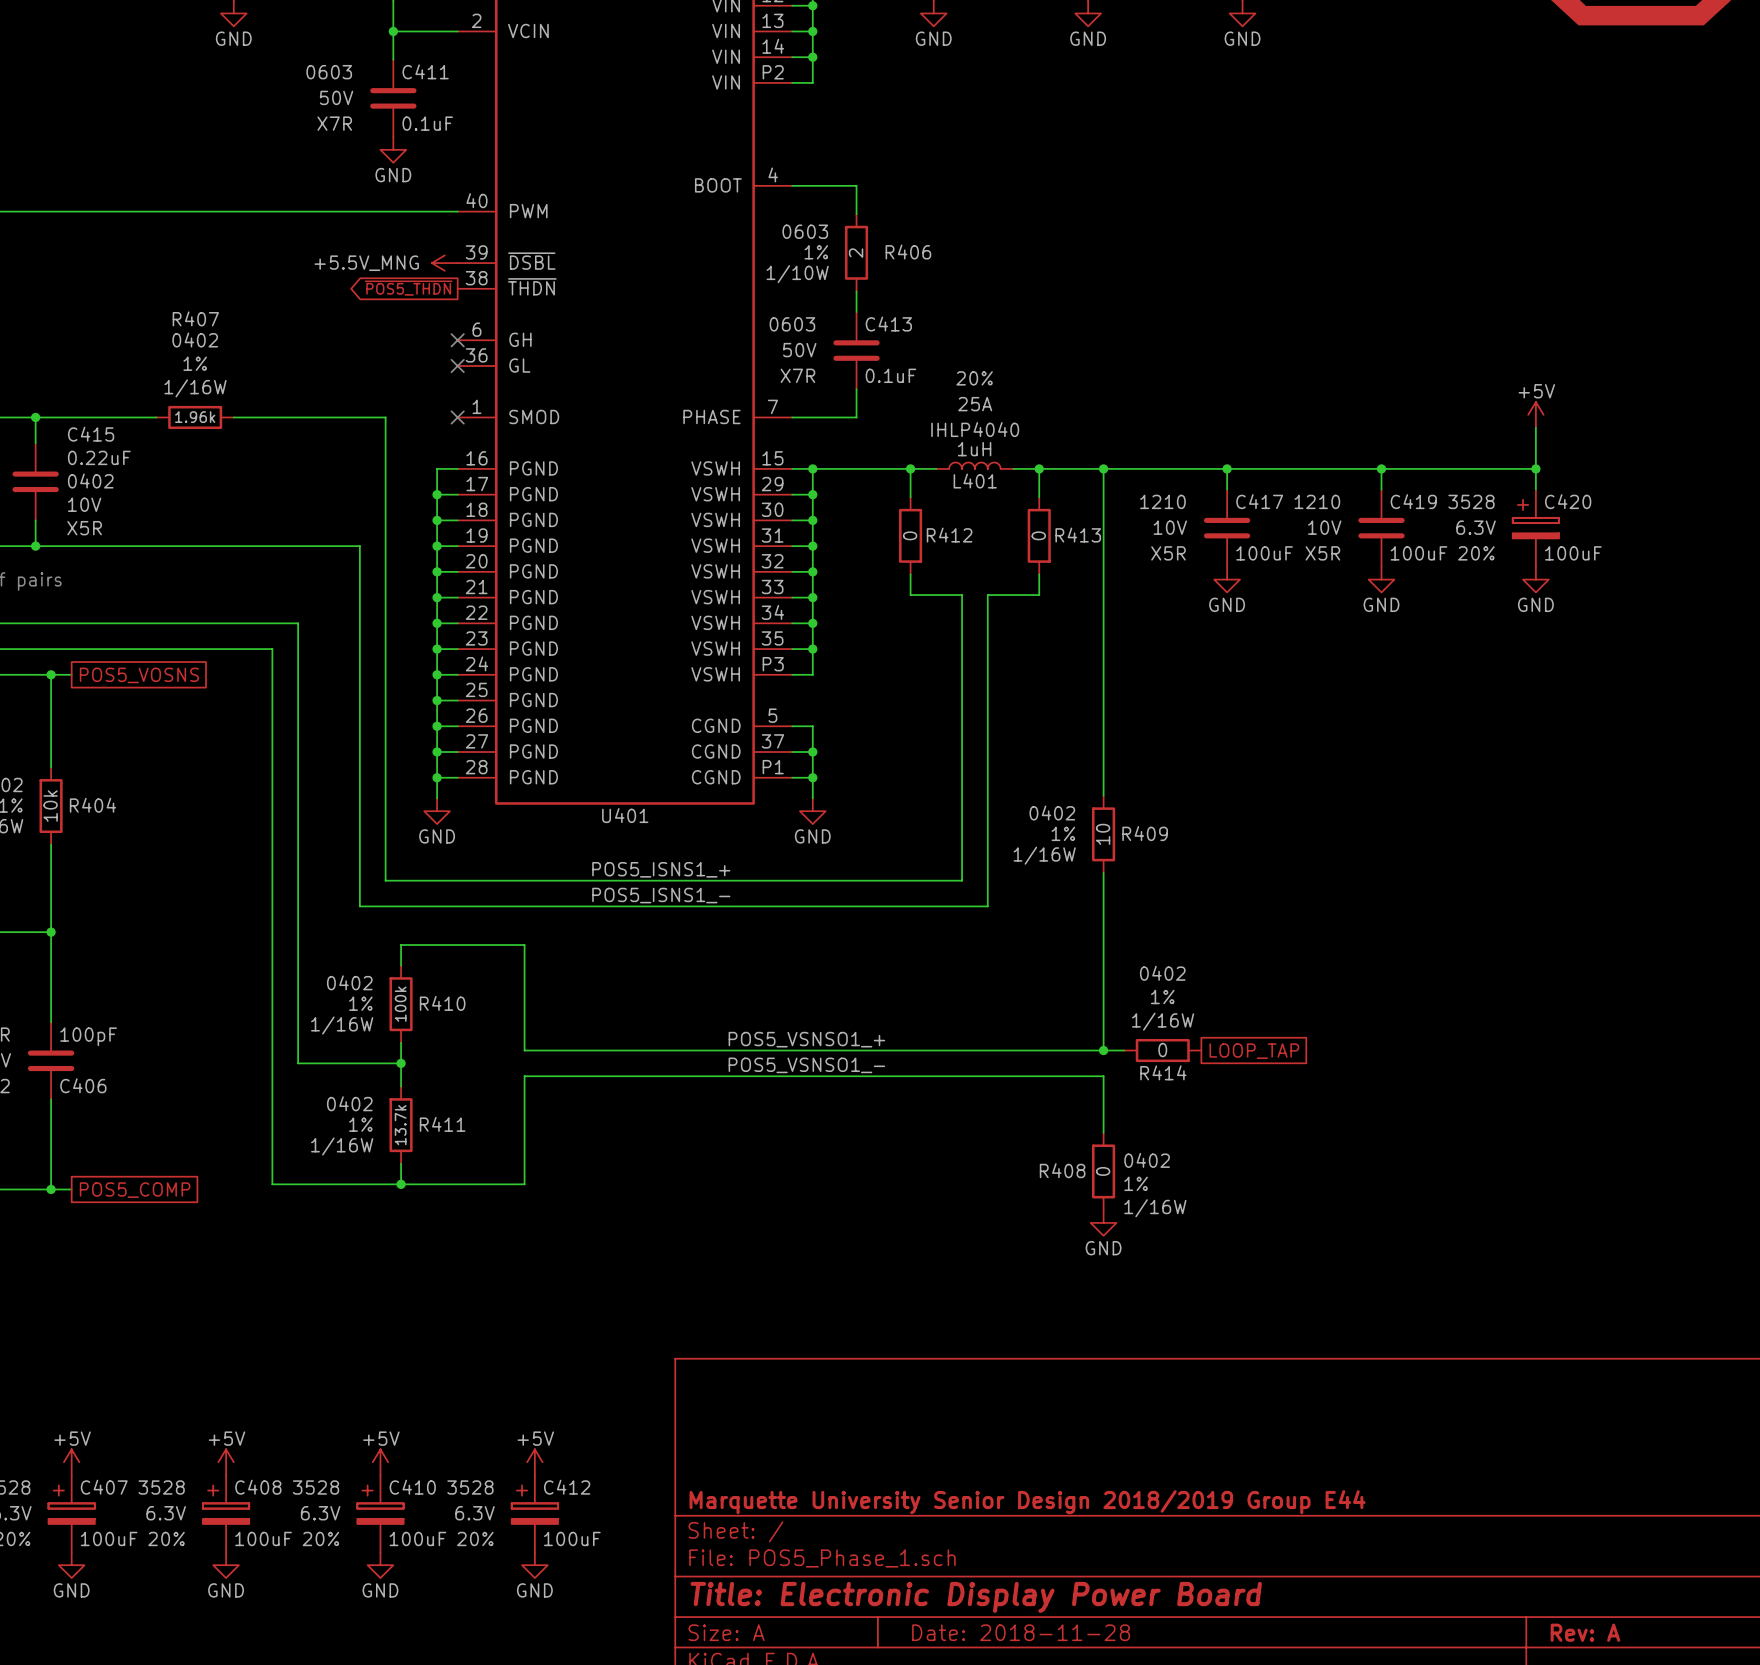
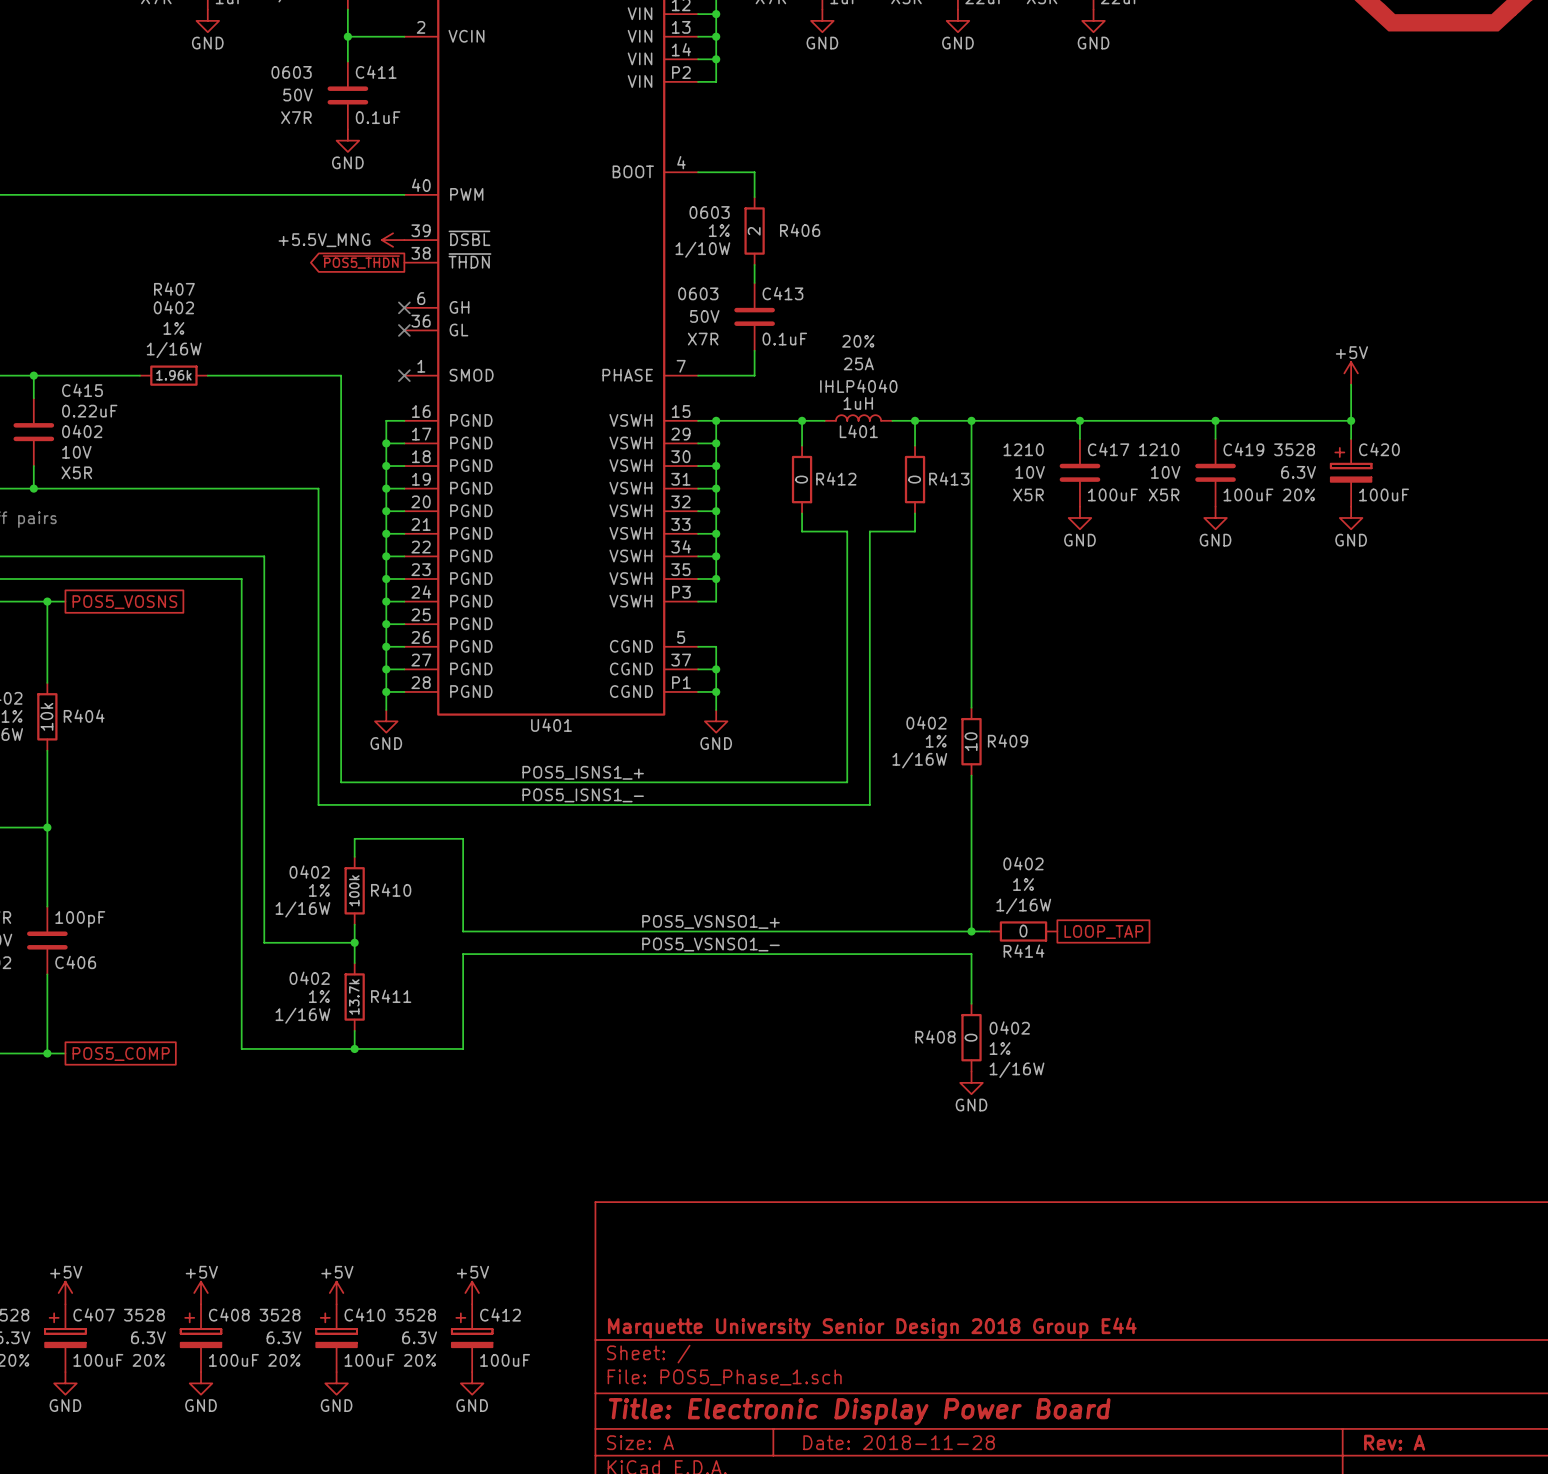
title block: Marquette University Senior Design 2018/2019 Group E44 (1027, 1502) -> Marquette University Senior Design 2018 Group E44 (872, 1328)

